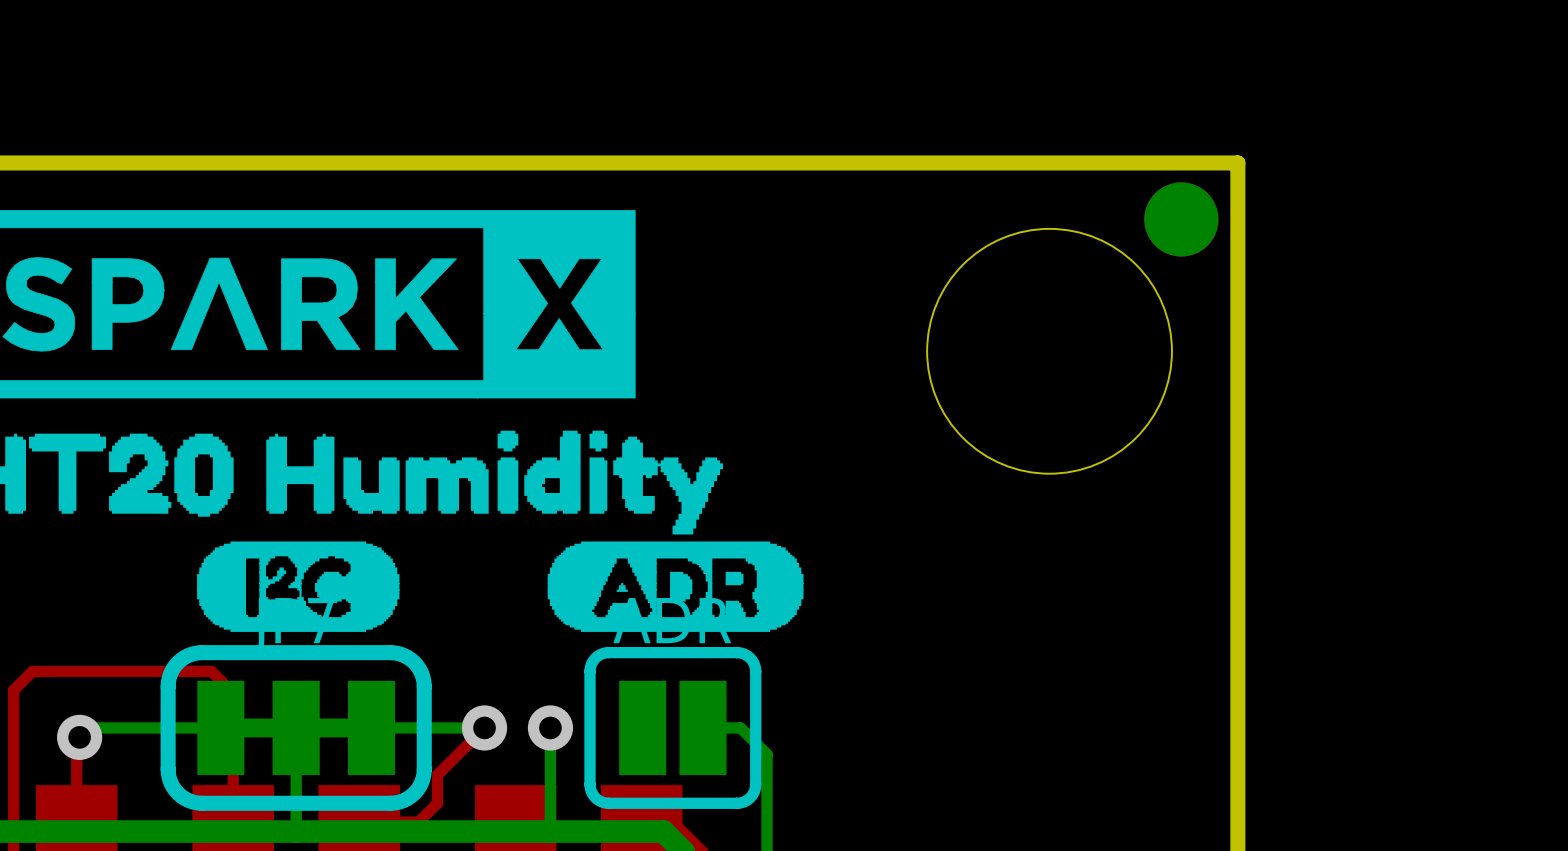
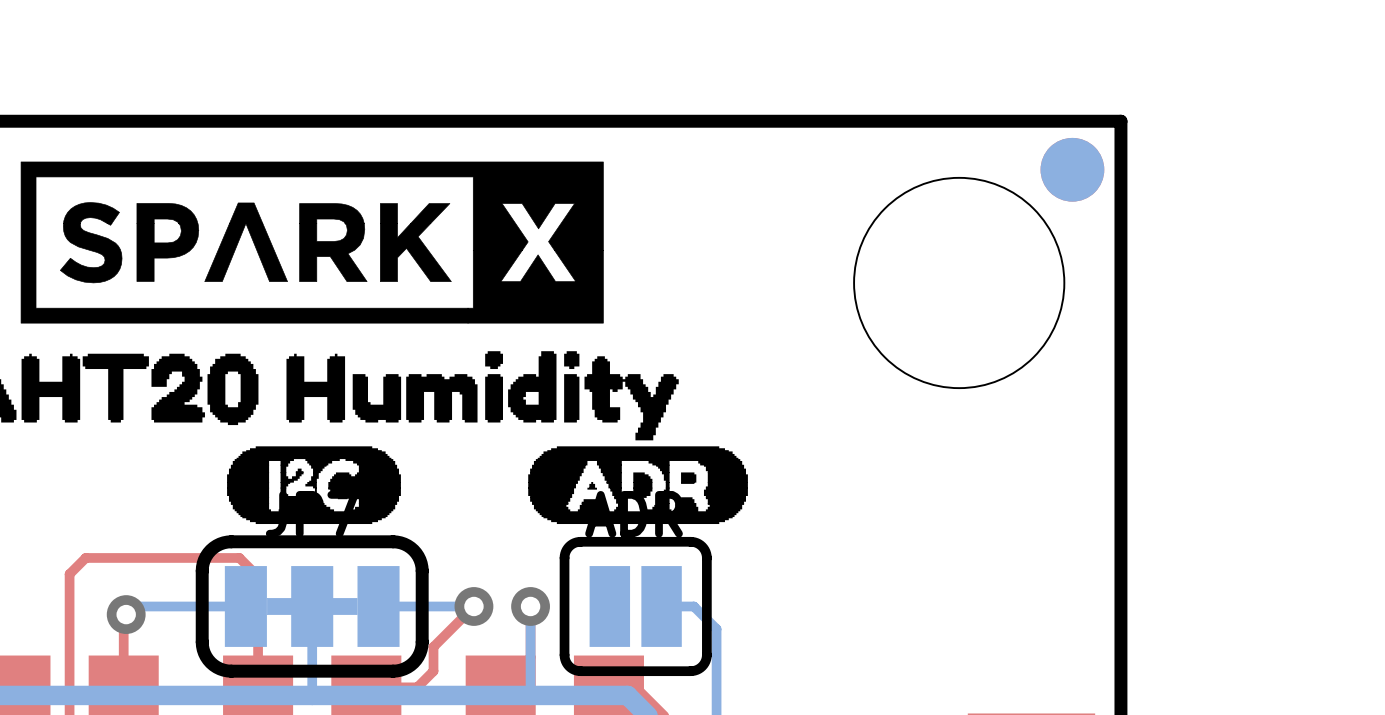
part footprint: [160, 645, 432, 811] -> [195, 535, 429, 678]

